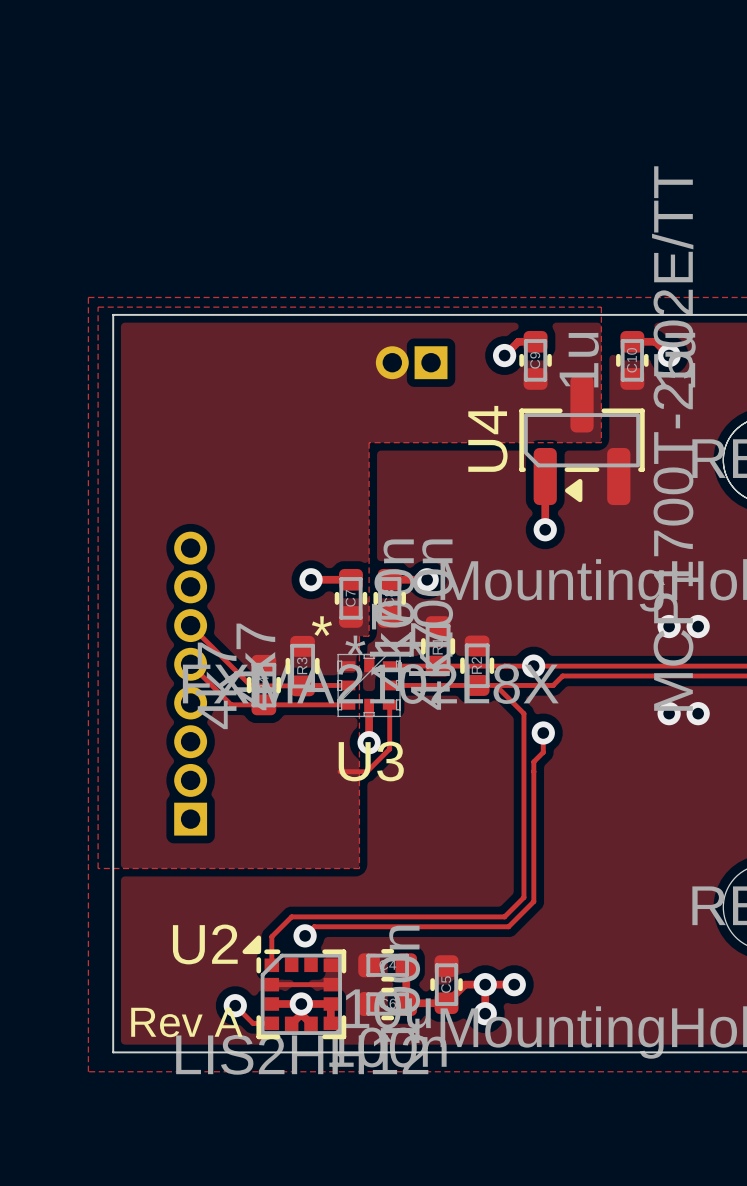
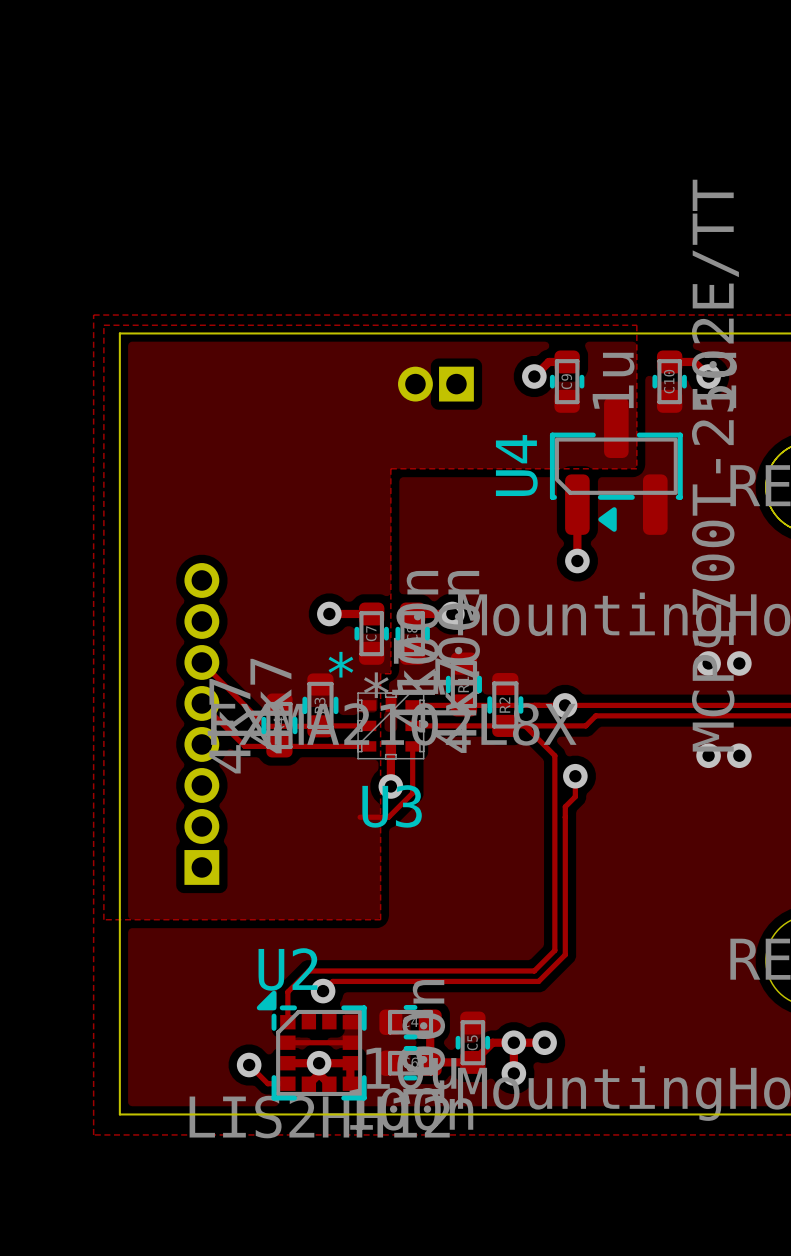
U2 name position: U2 (205, 944) -> U2 (287, 969)
text: Rev A (186, 1022) -> none

